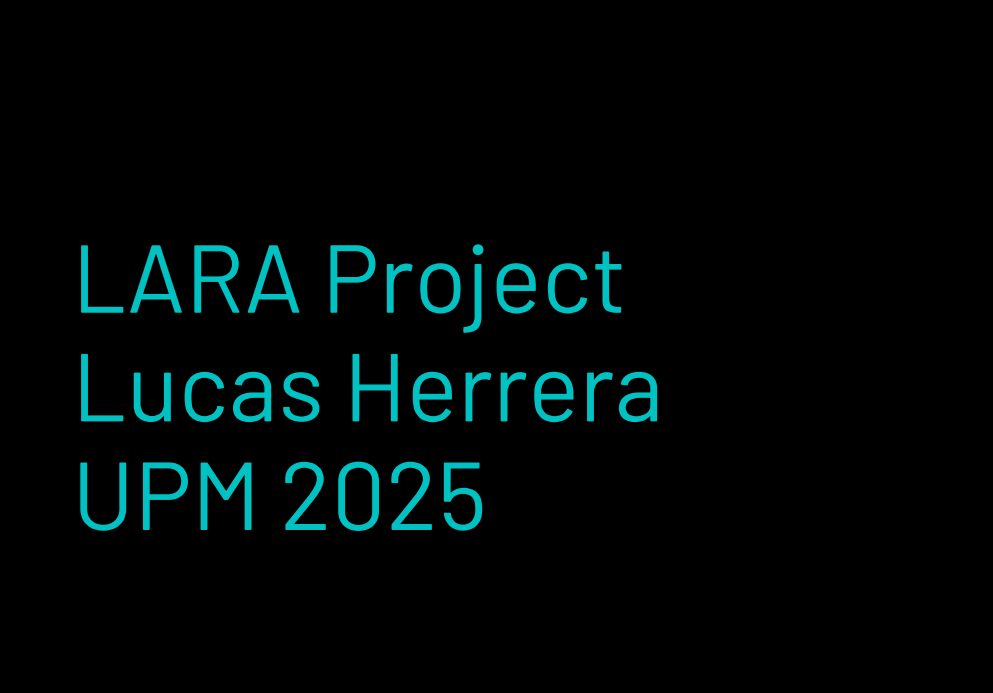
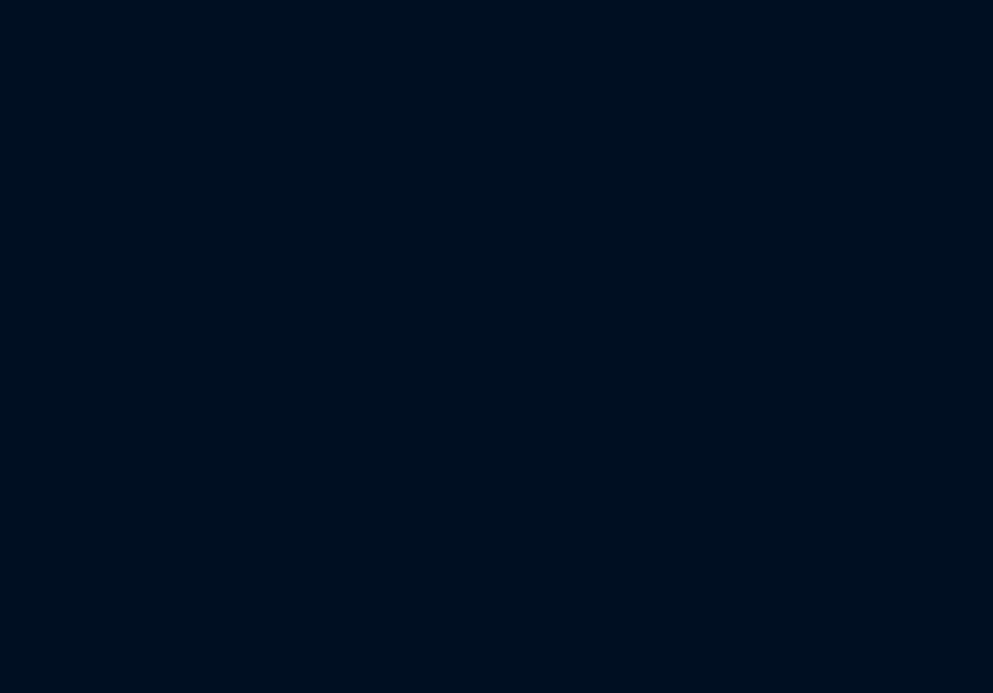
text: LARA Project (351, 288) -> none
text: Lucas Herrera (369, 388) -> none
text: UPM 2025 (281, 496) -> none

